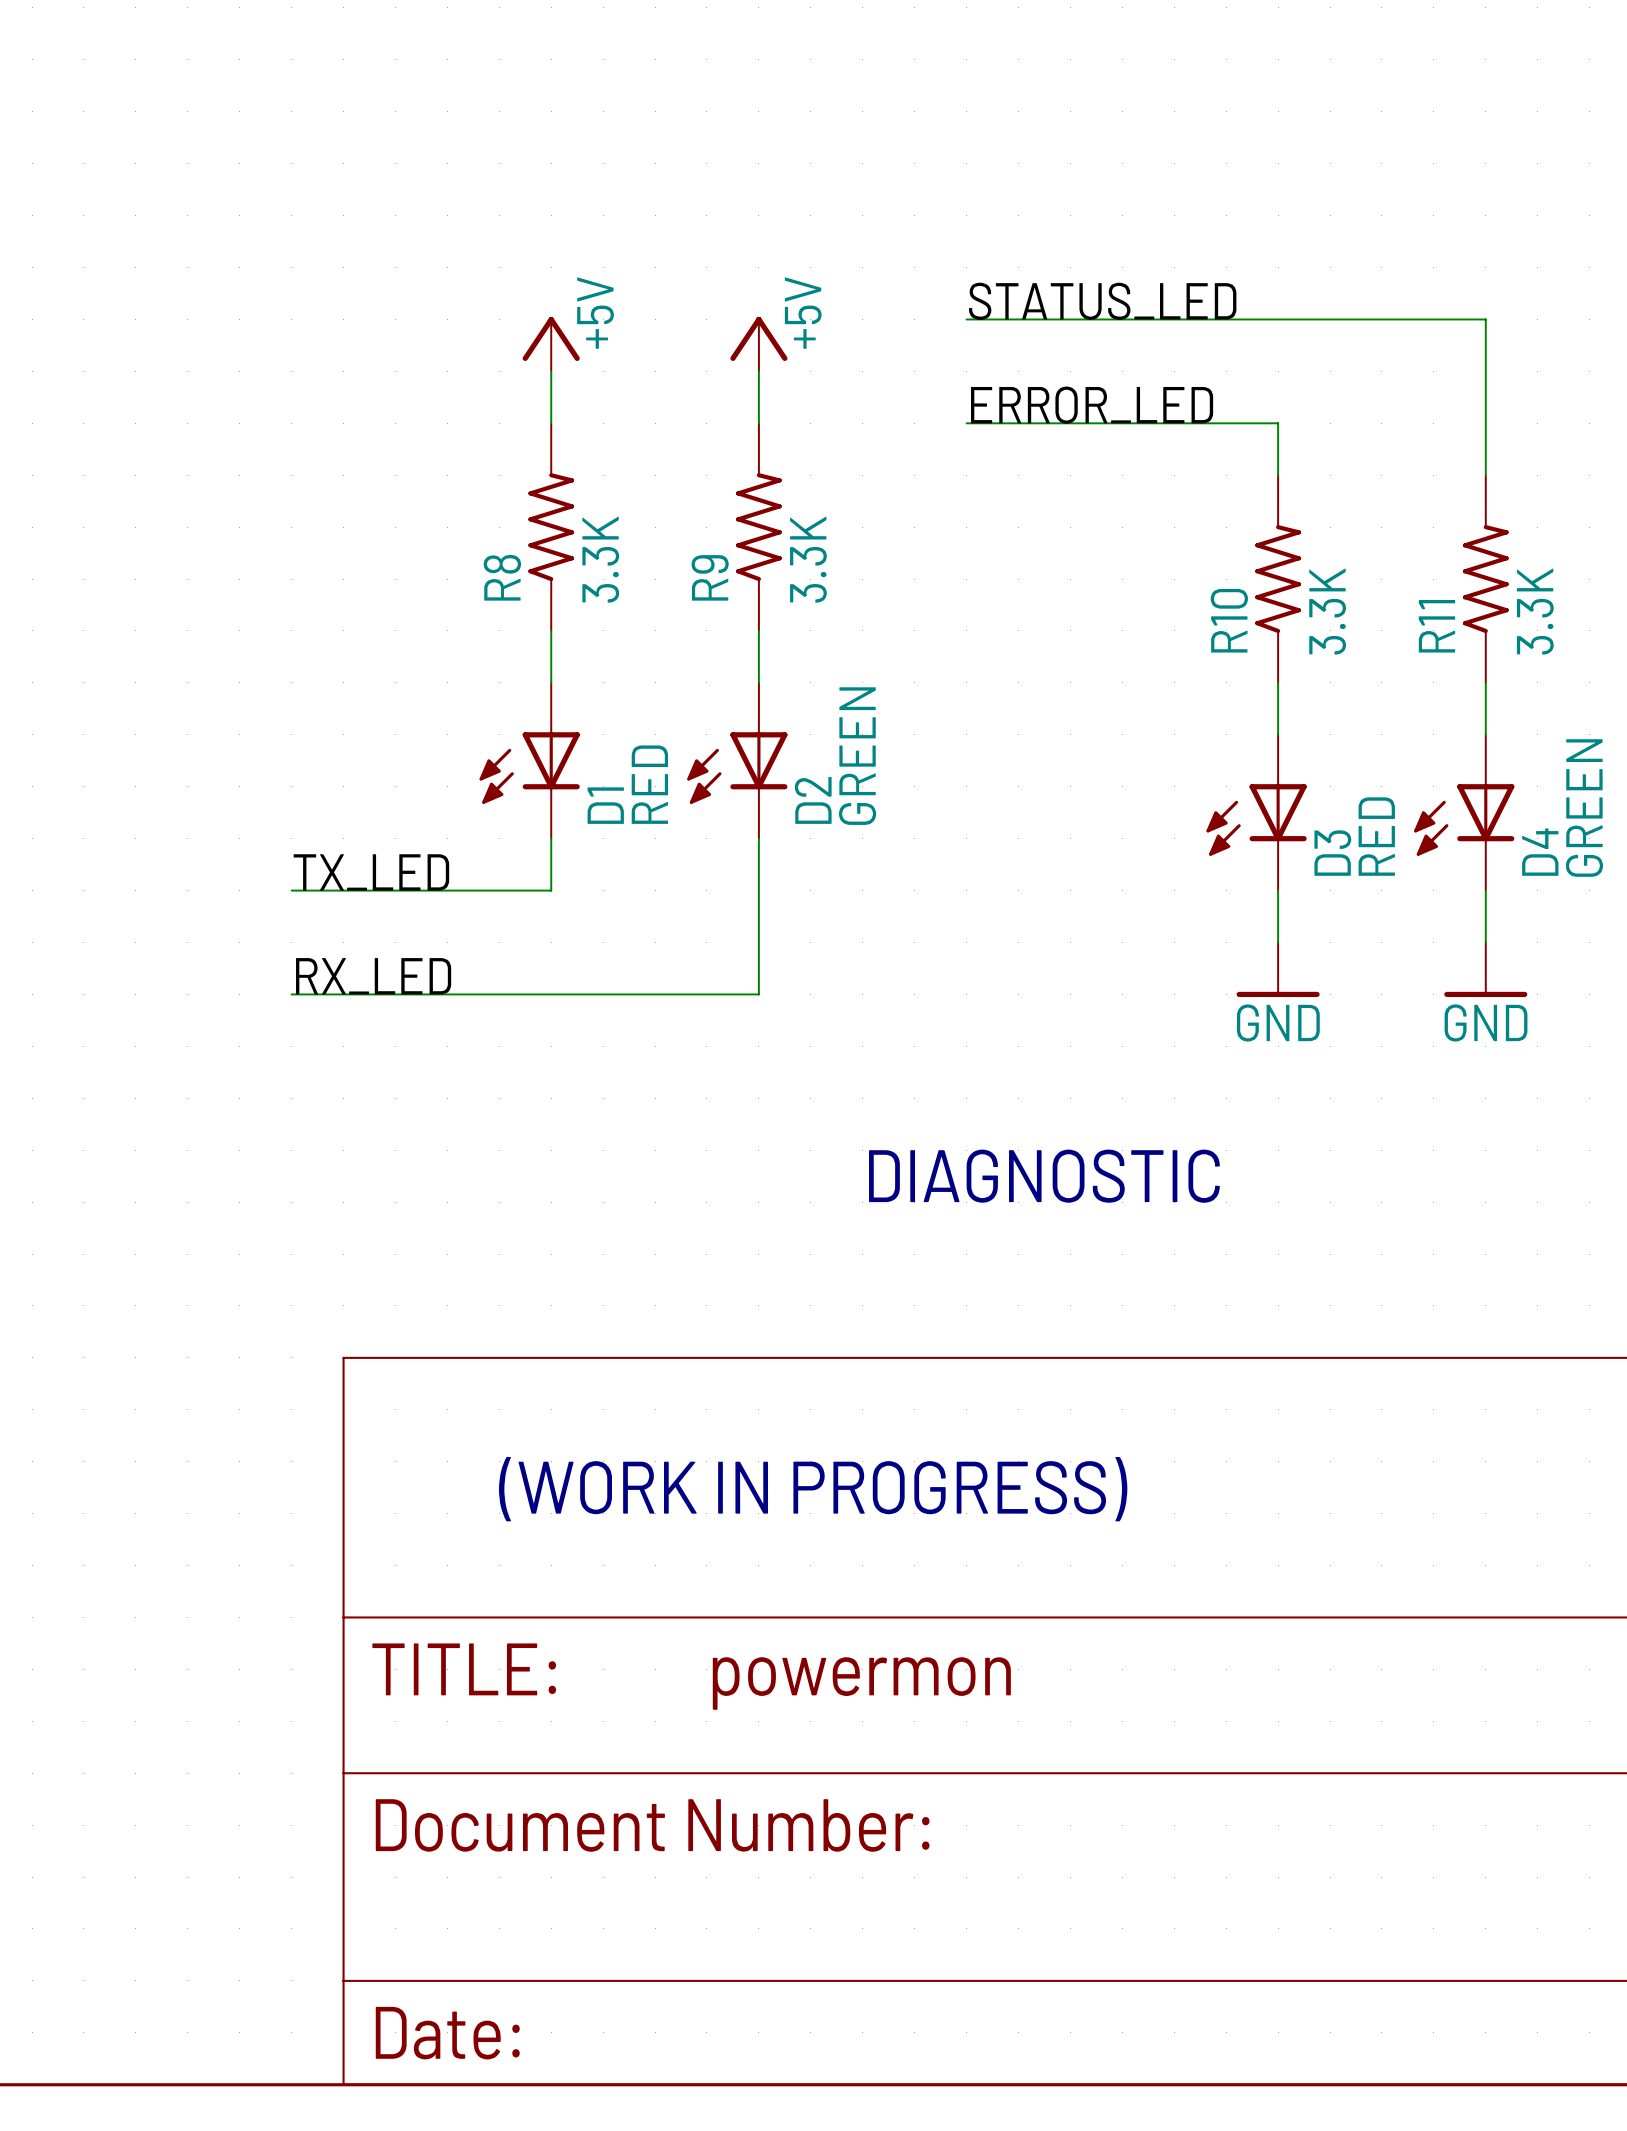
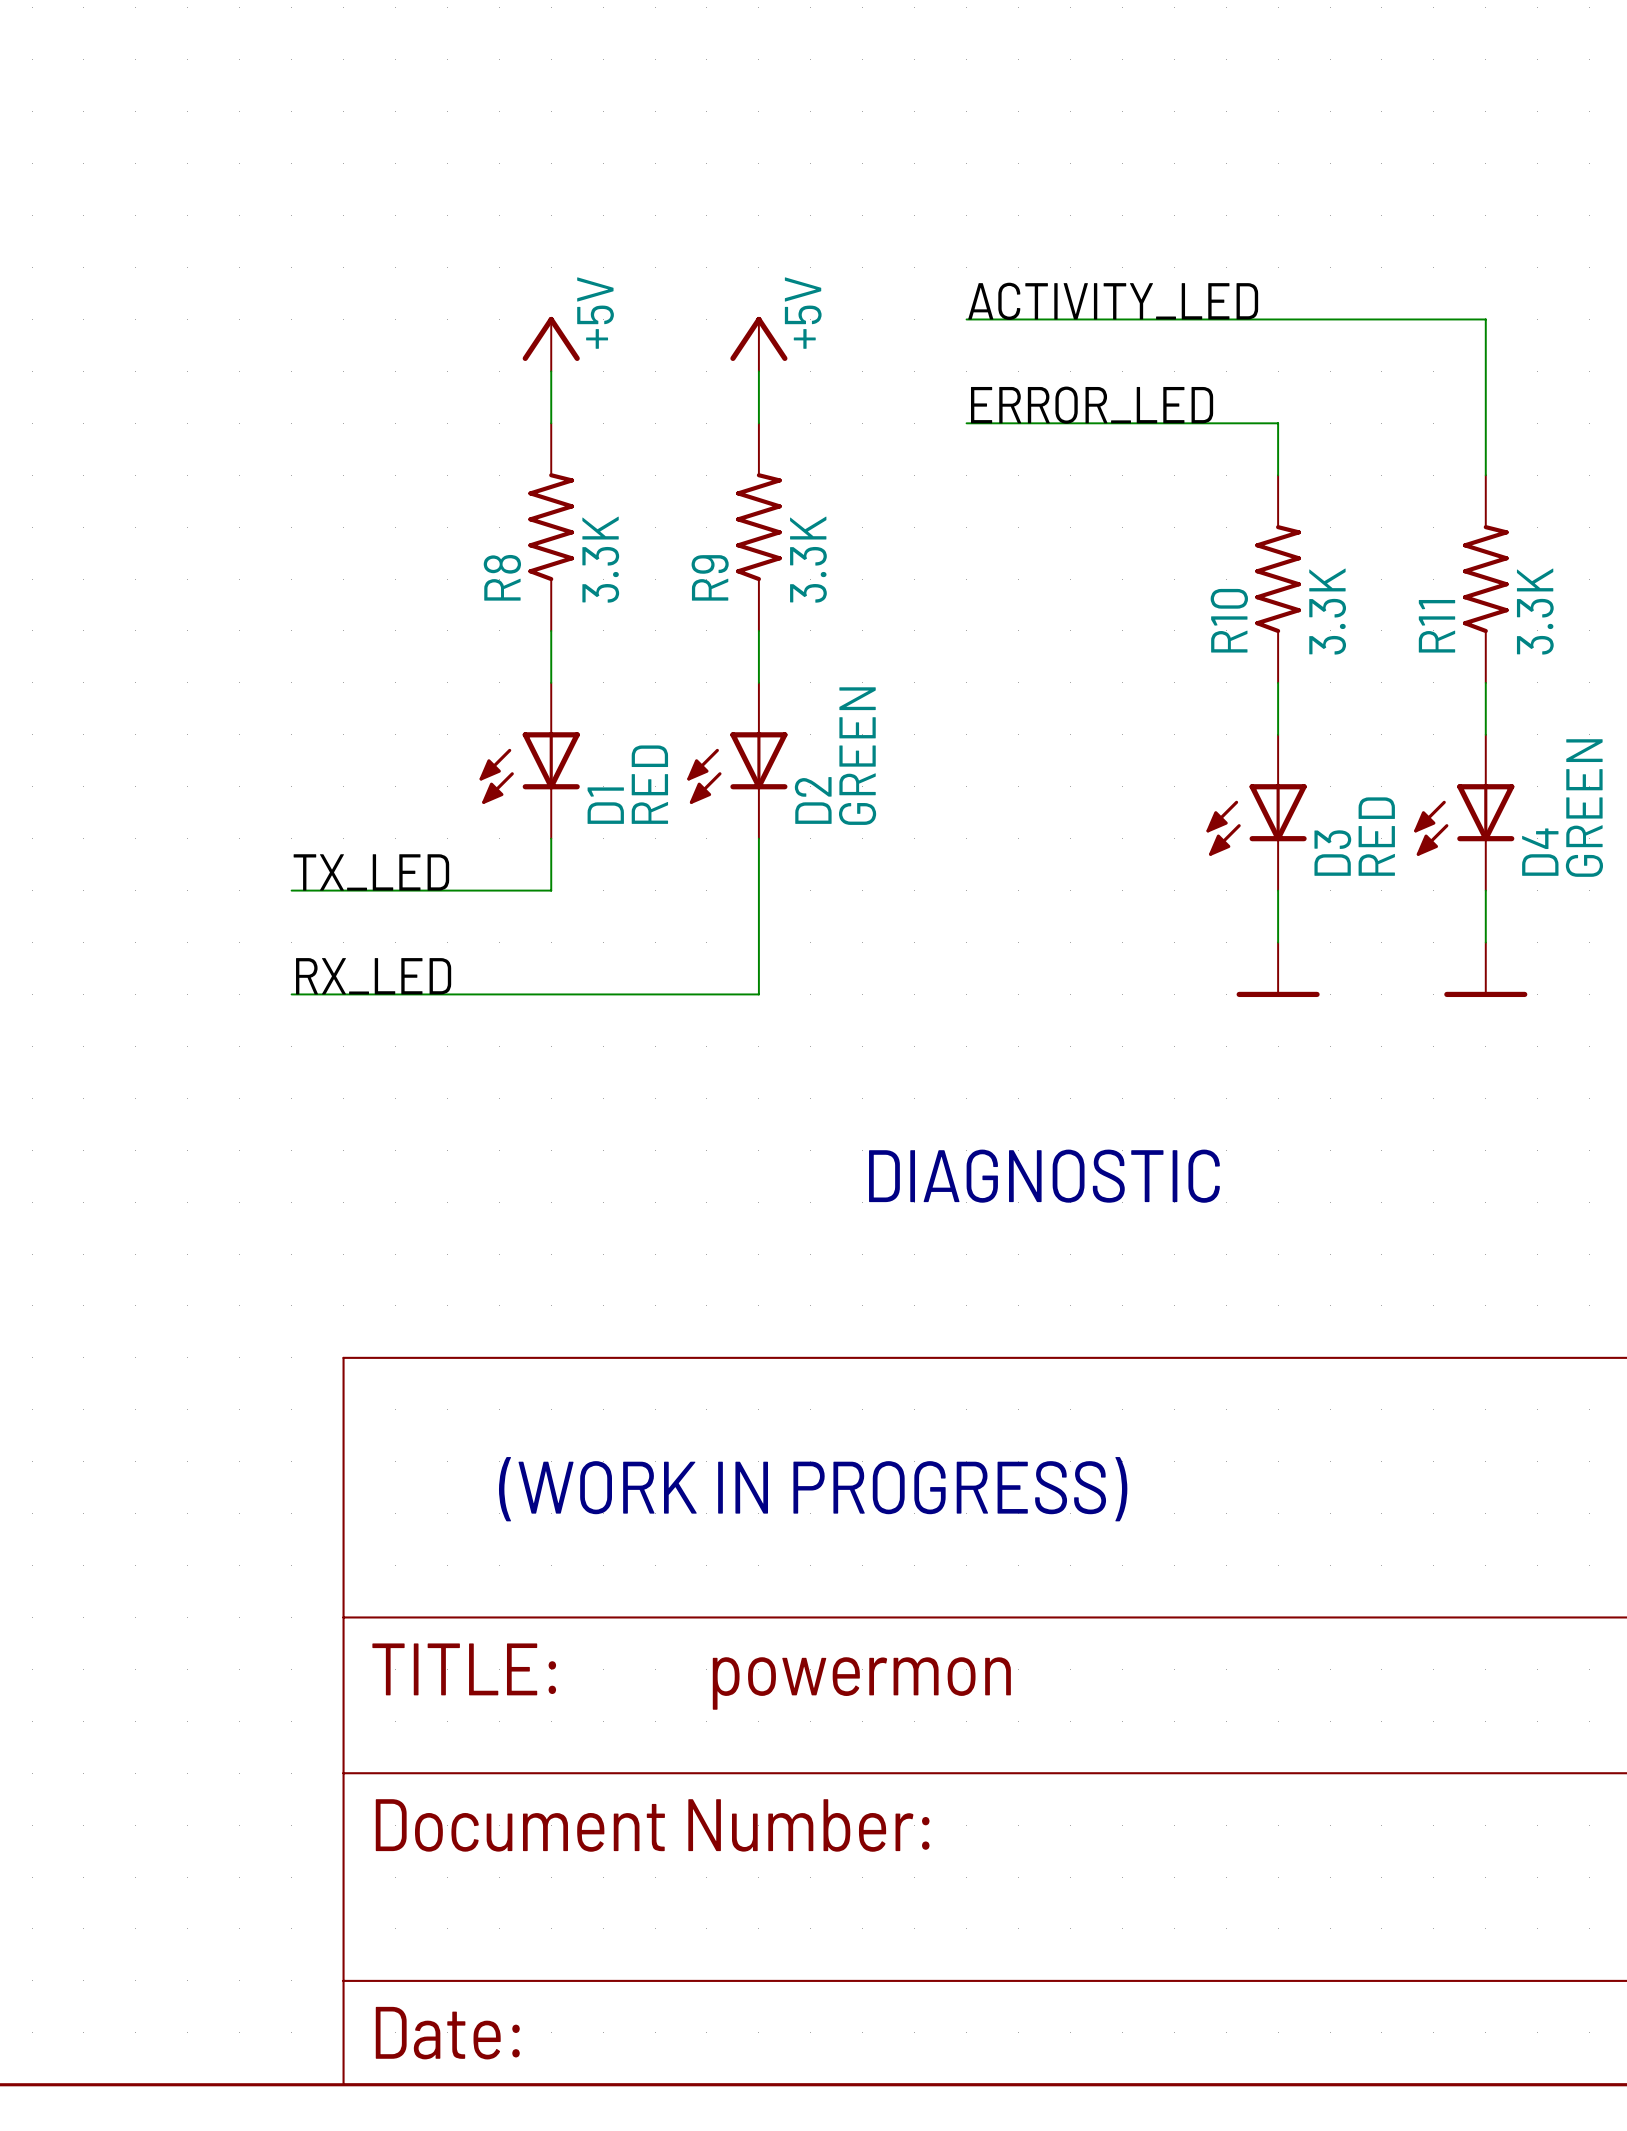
label: STATUS_LED (1102, 301) -> ACTIVITY_LED (1113, 301)
power symbol text: GND (1278, 1022) -> none
power symbol text: GND (1486, 1022) -> none

